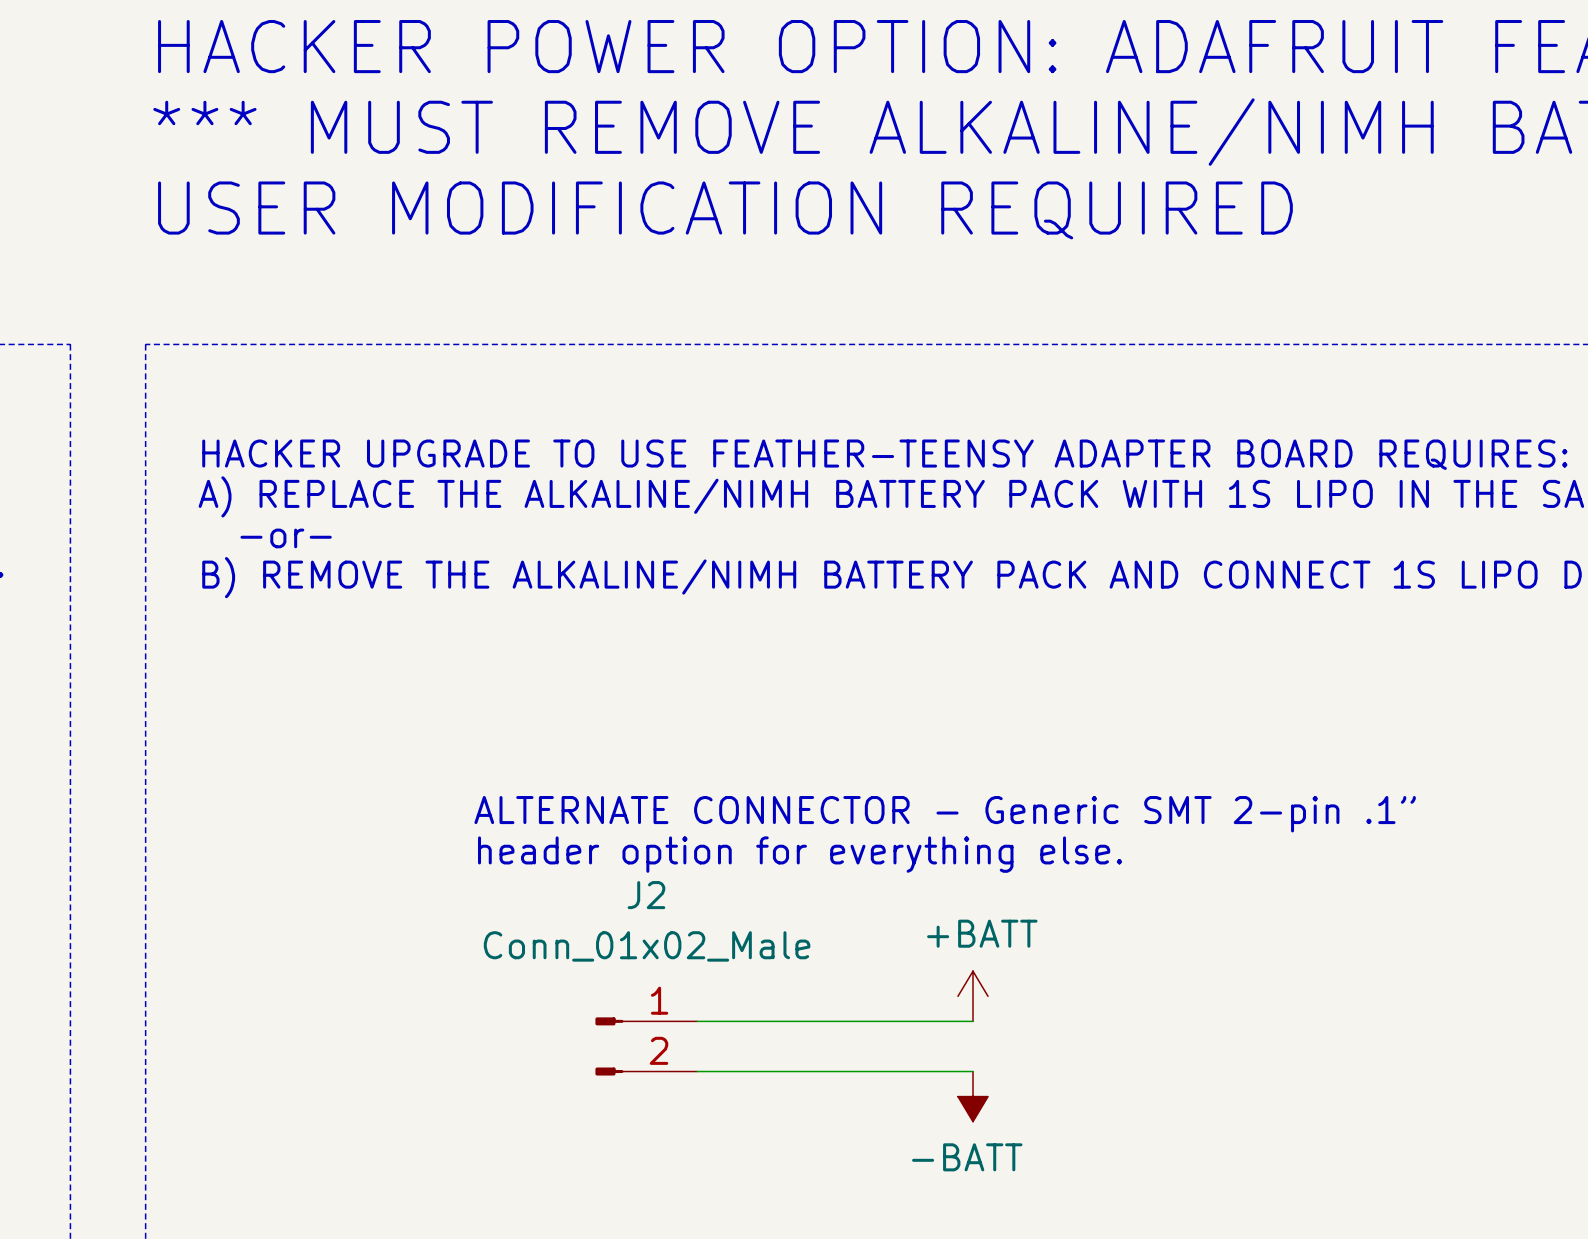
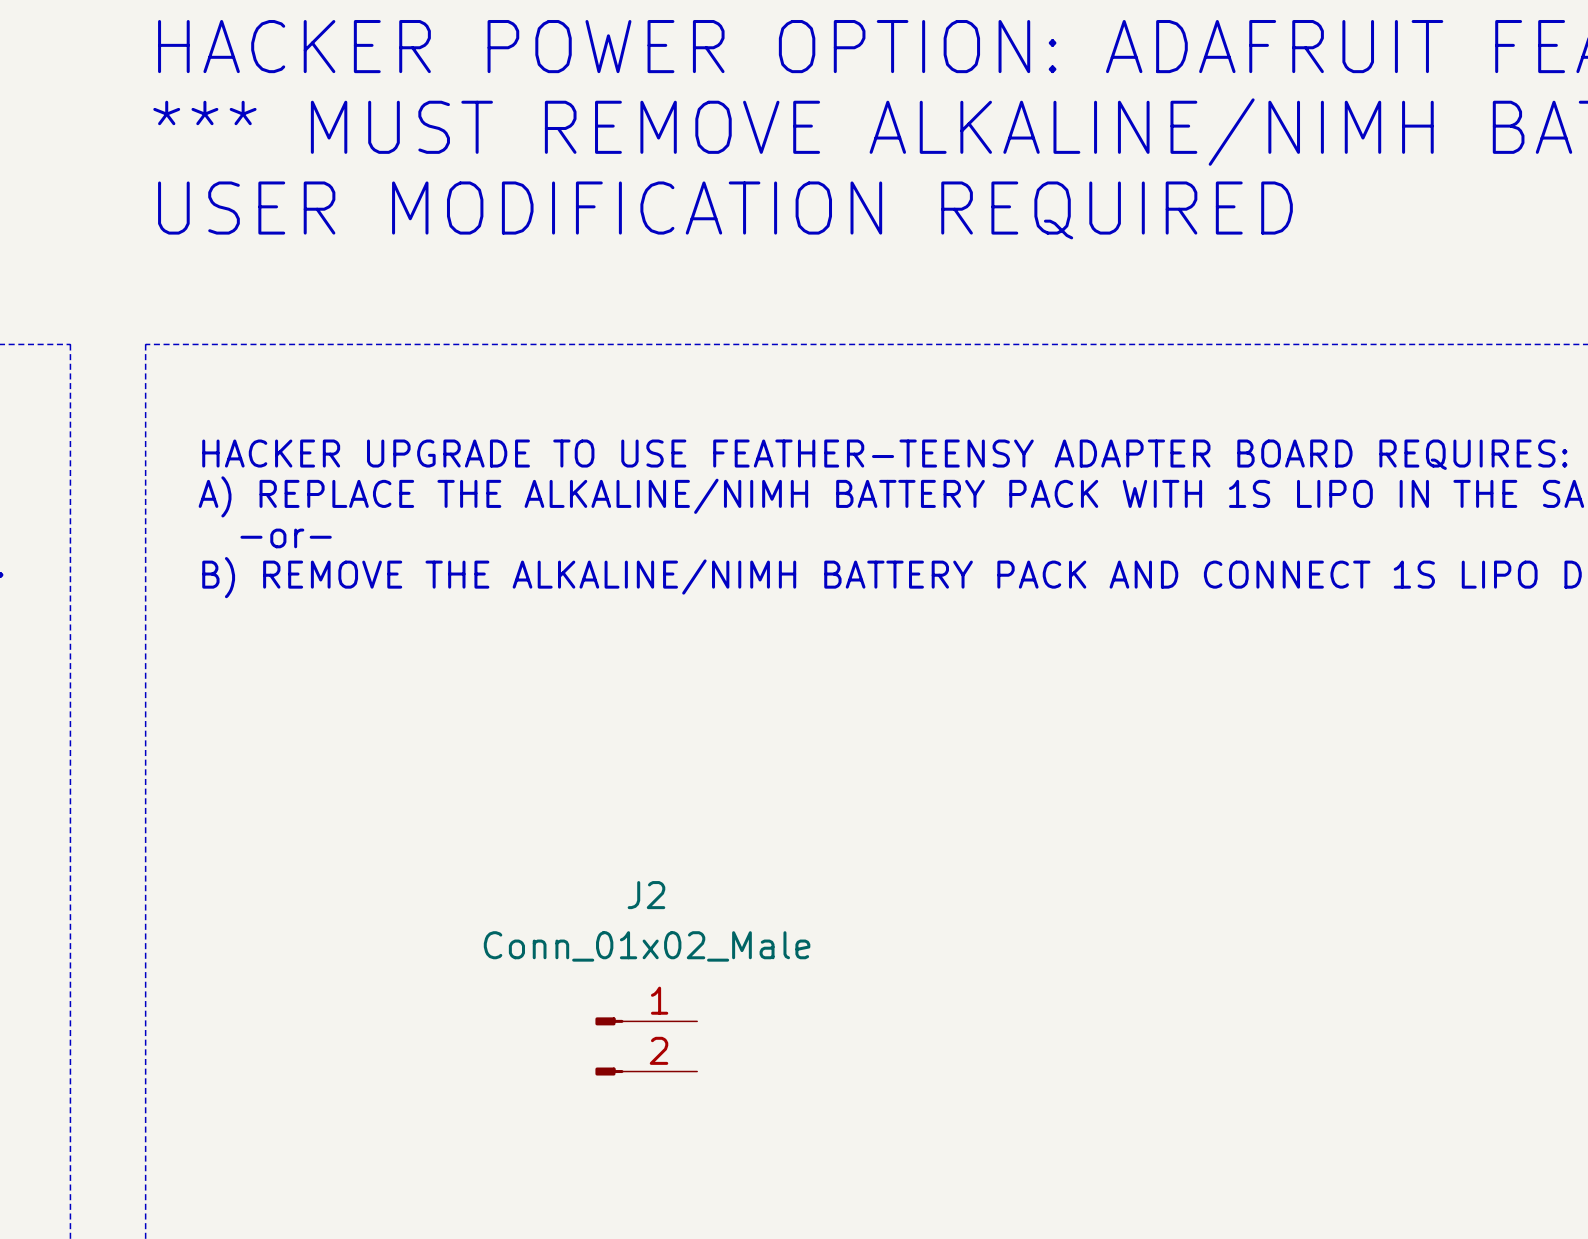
text: ALTERNATE CONNECTOR - Generic SMT 2-pin .1” (945, 814) -> none
text: header option for everything else. (800, 854) -> none
power symbol: +BATT (972, 996) -> none
wire: (697, 1021) (972, 1021) -> none
wire: (697, 1071) (972, 1071) -> none
power symbol: -BATT (972, 1096) -> none

